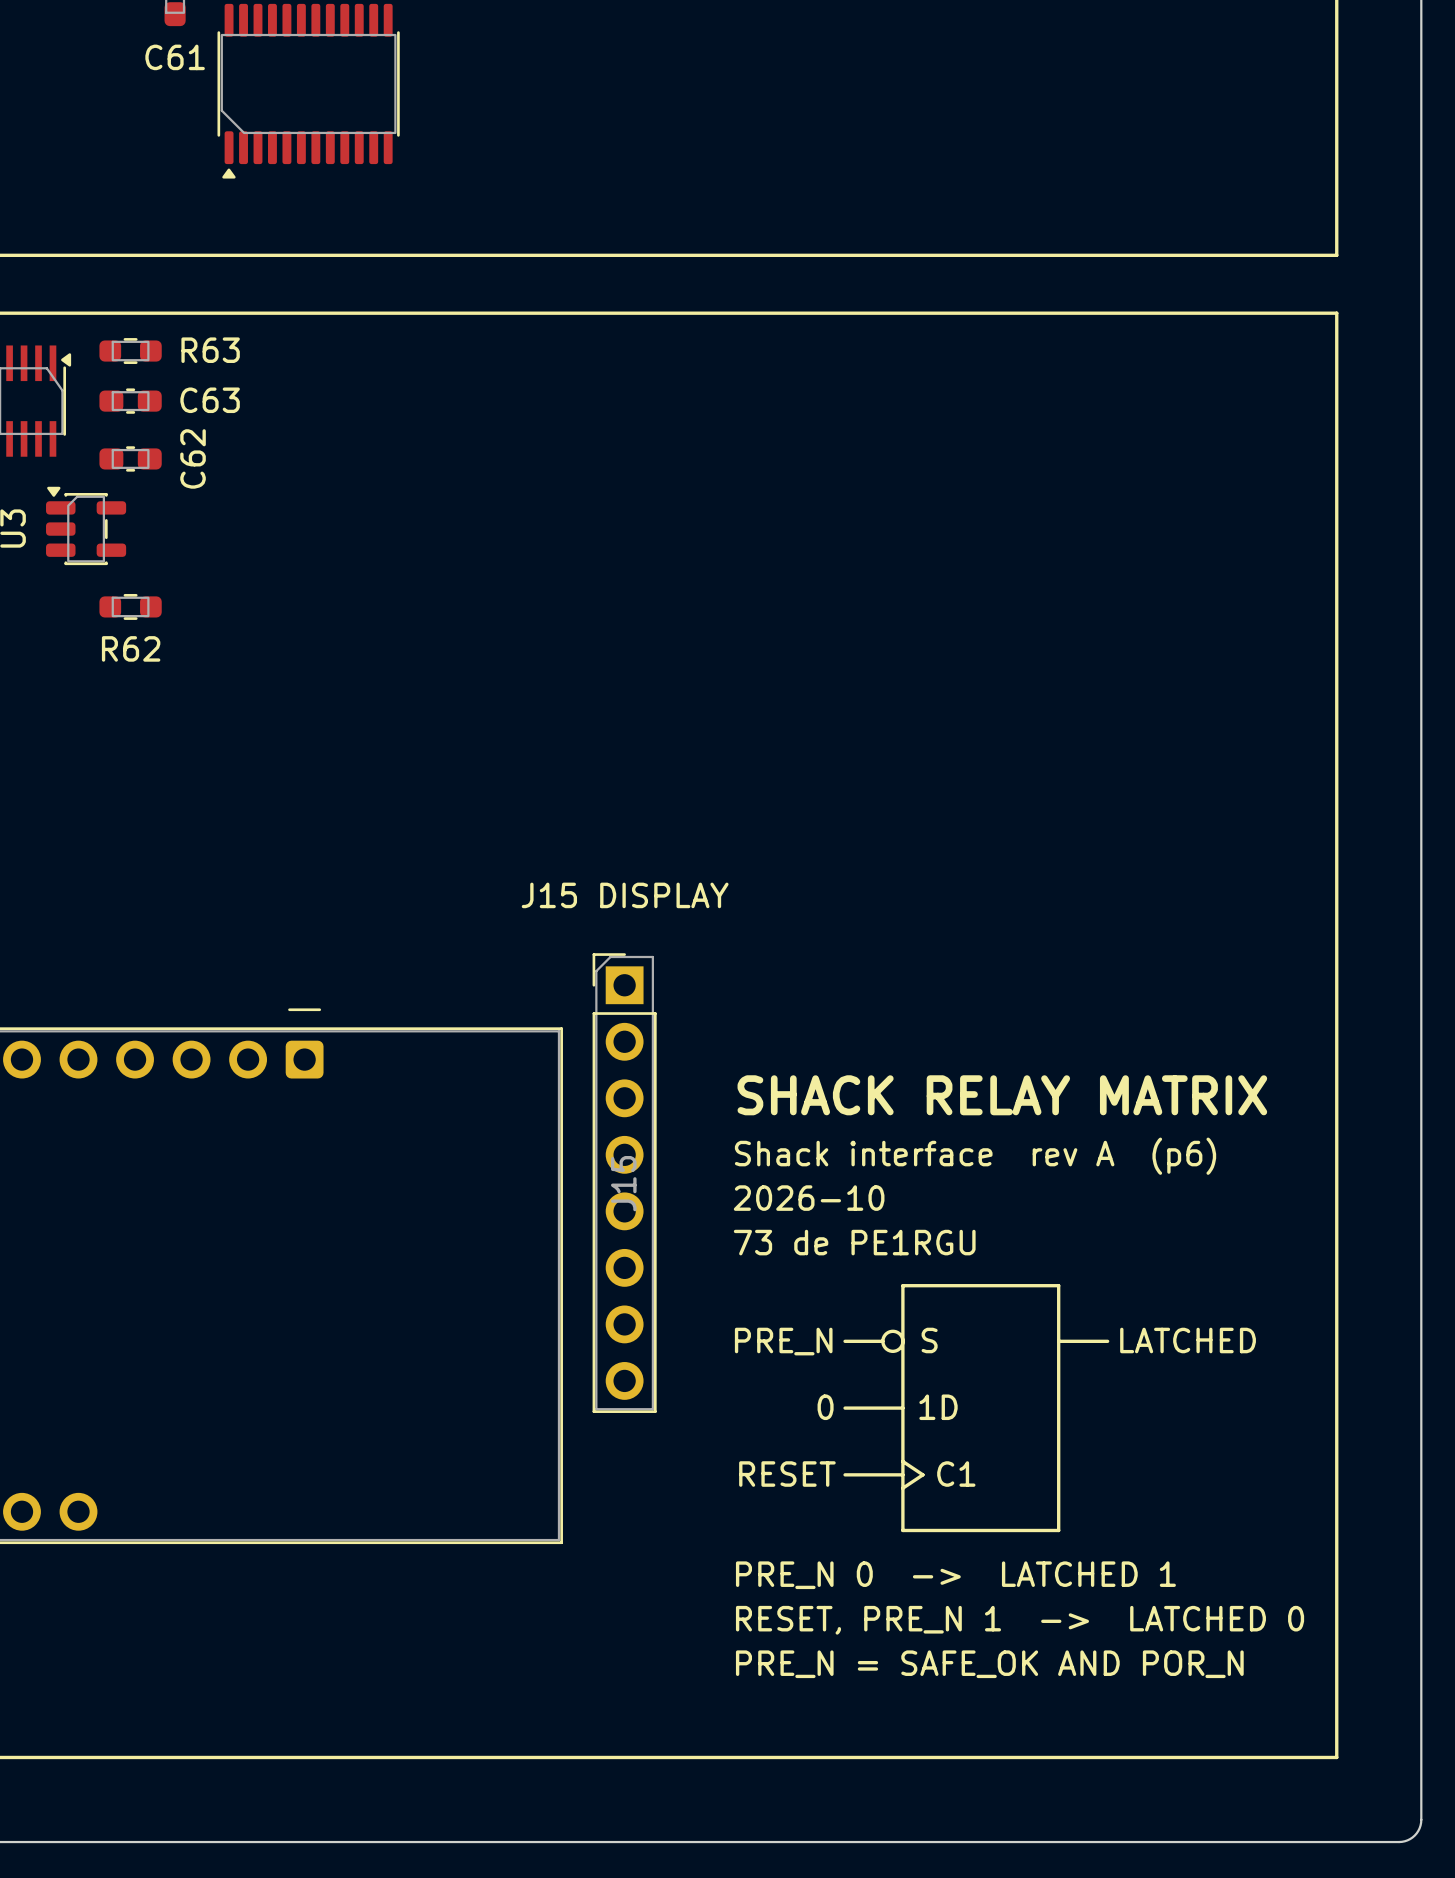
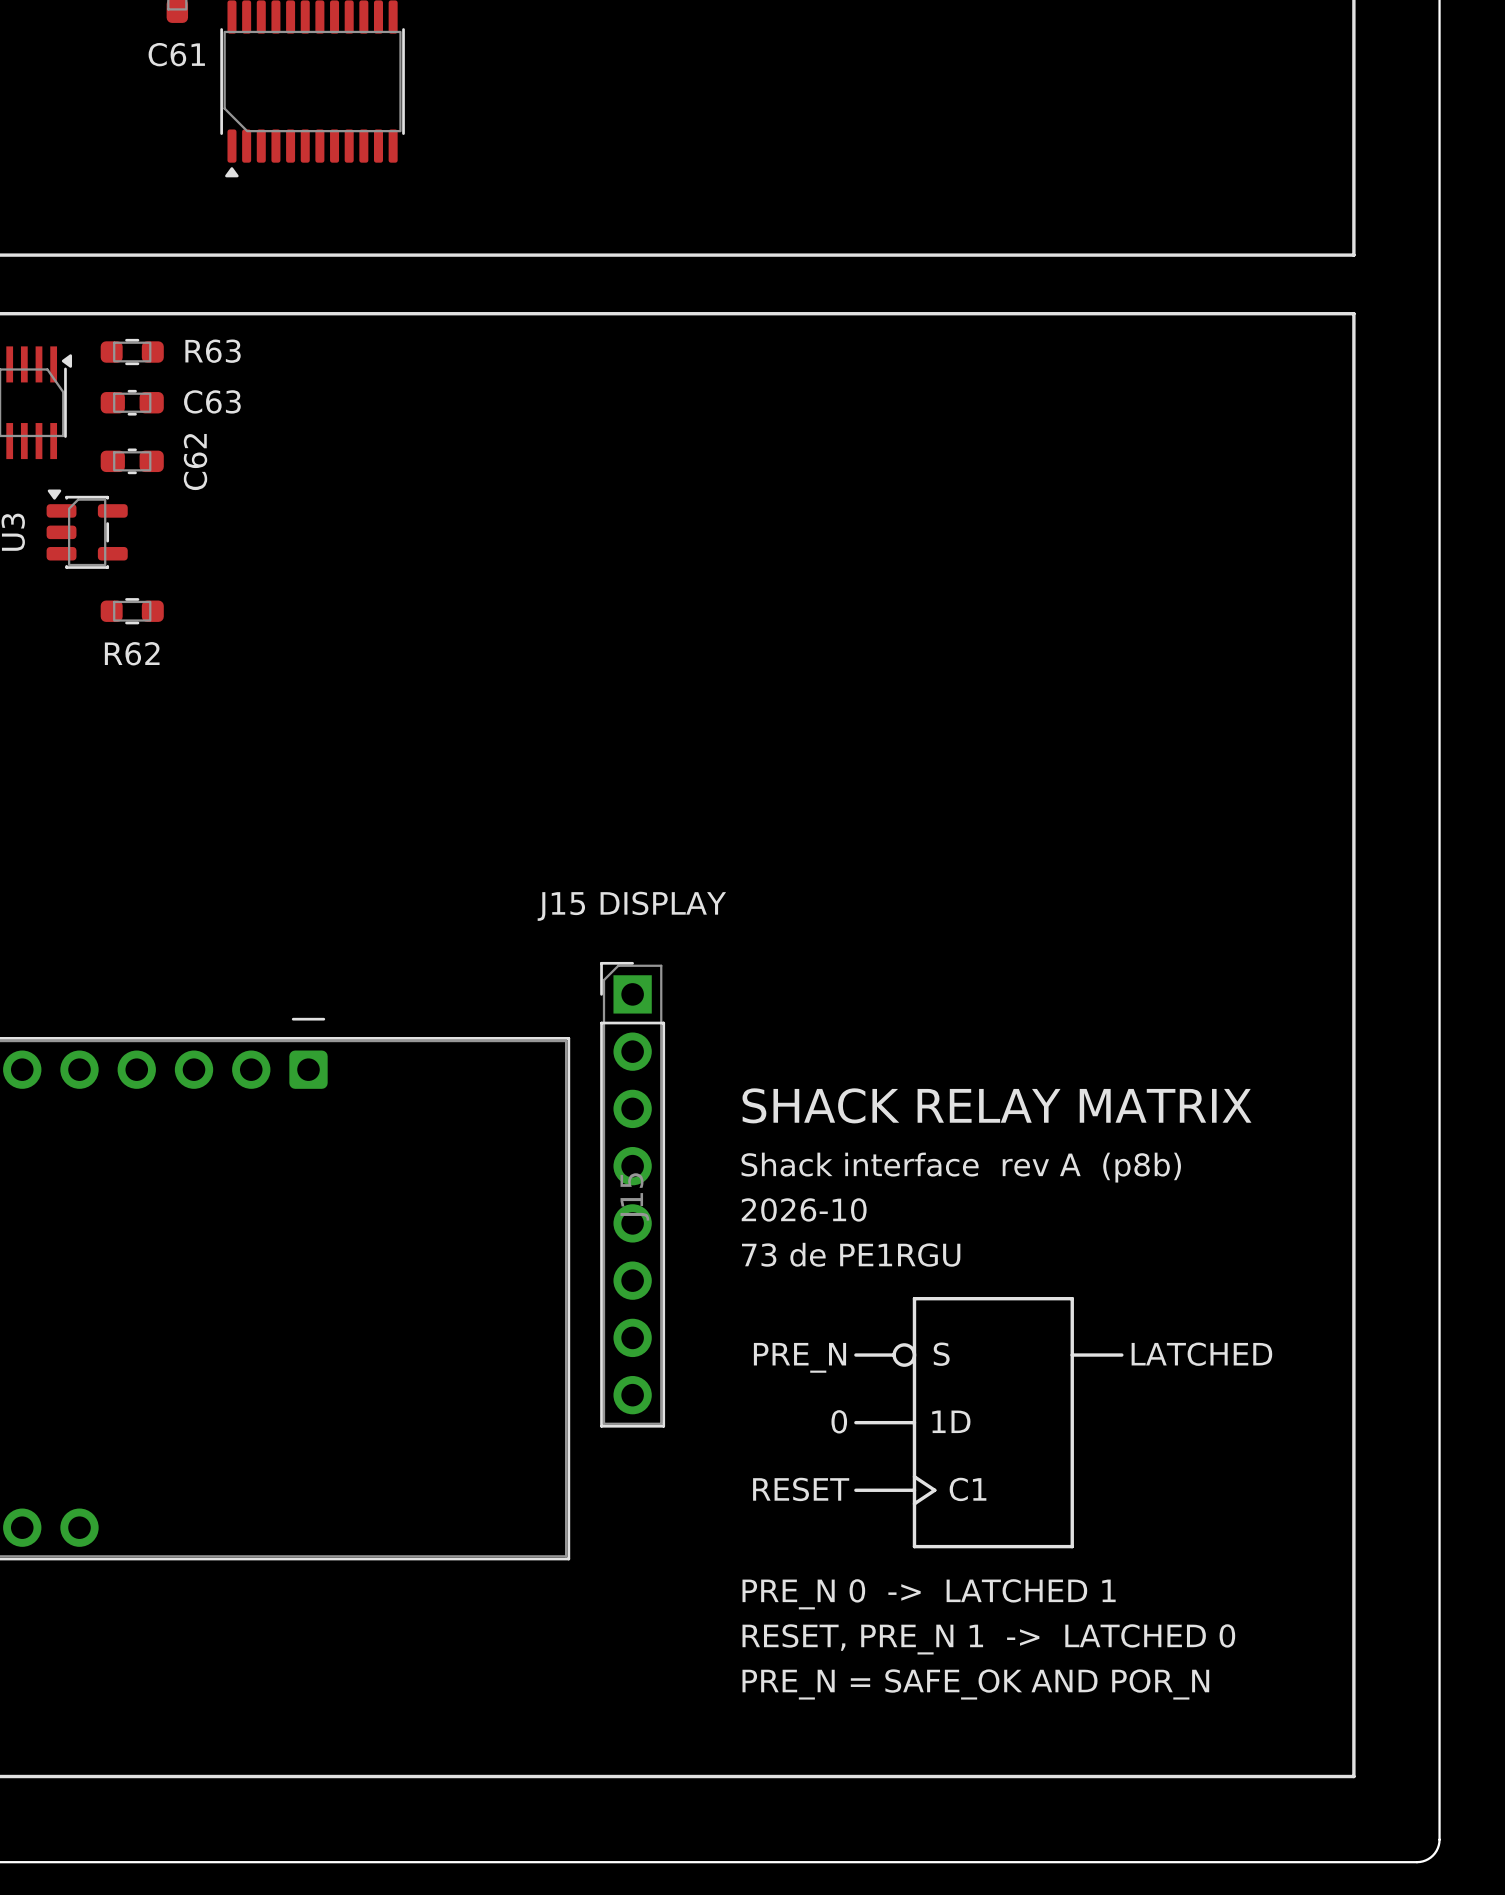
text: Shack interface rev A (p6) (975, 1156) -> Shack interface rev A (p8b) (961, 1167)

